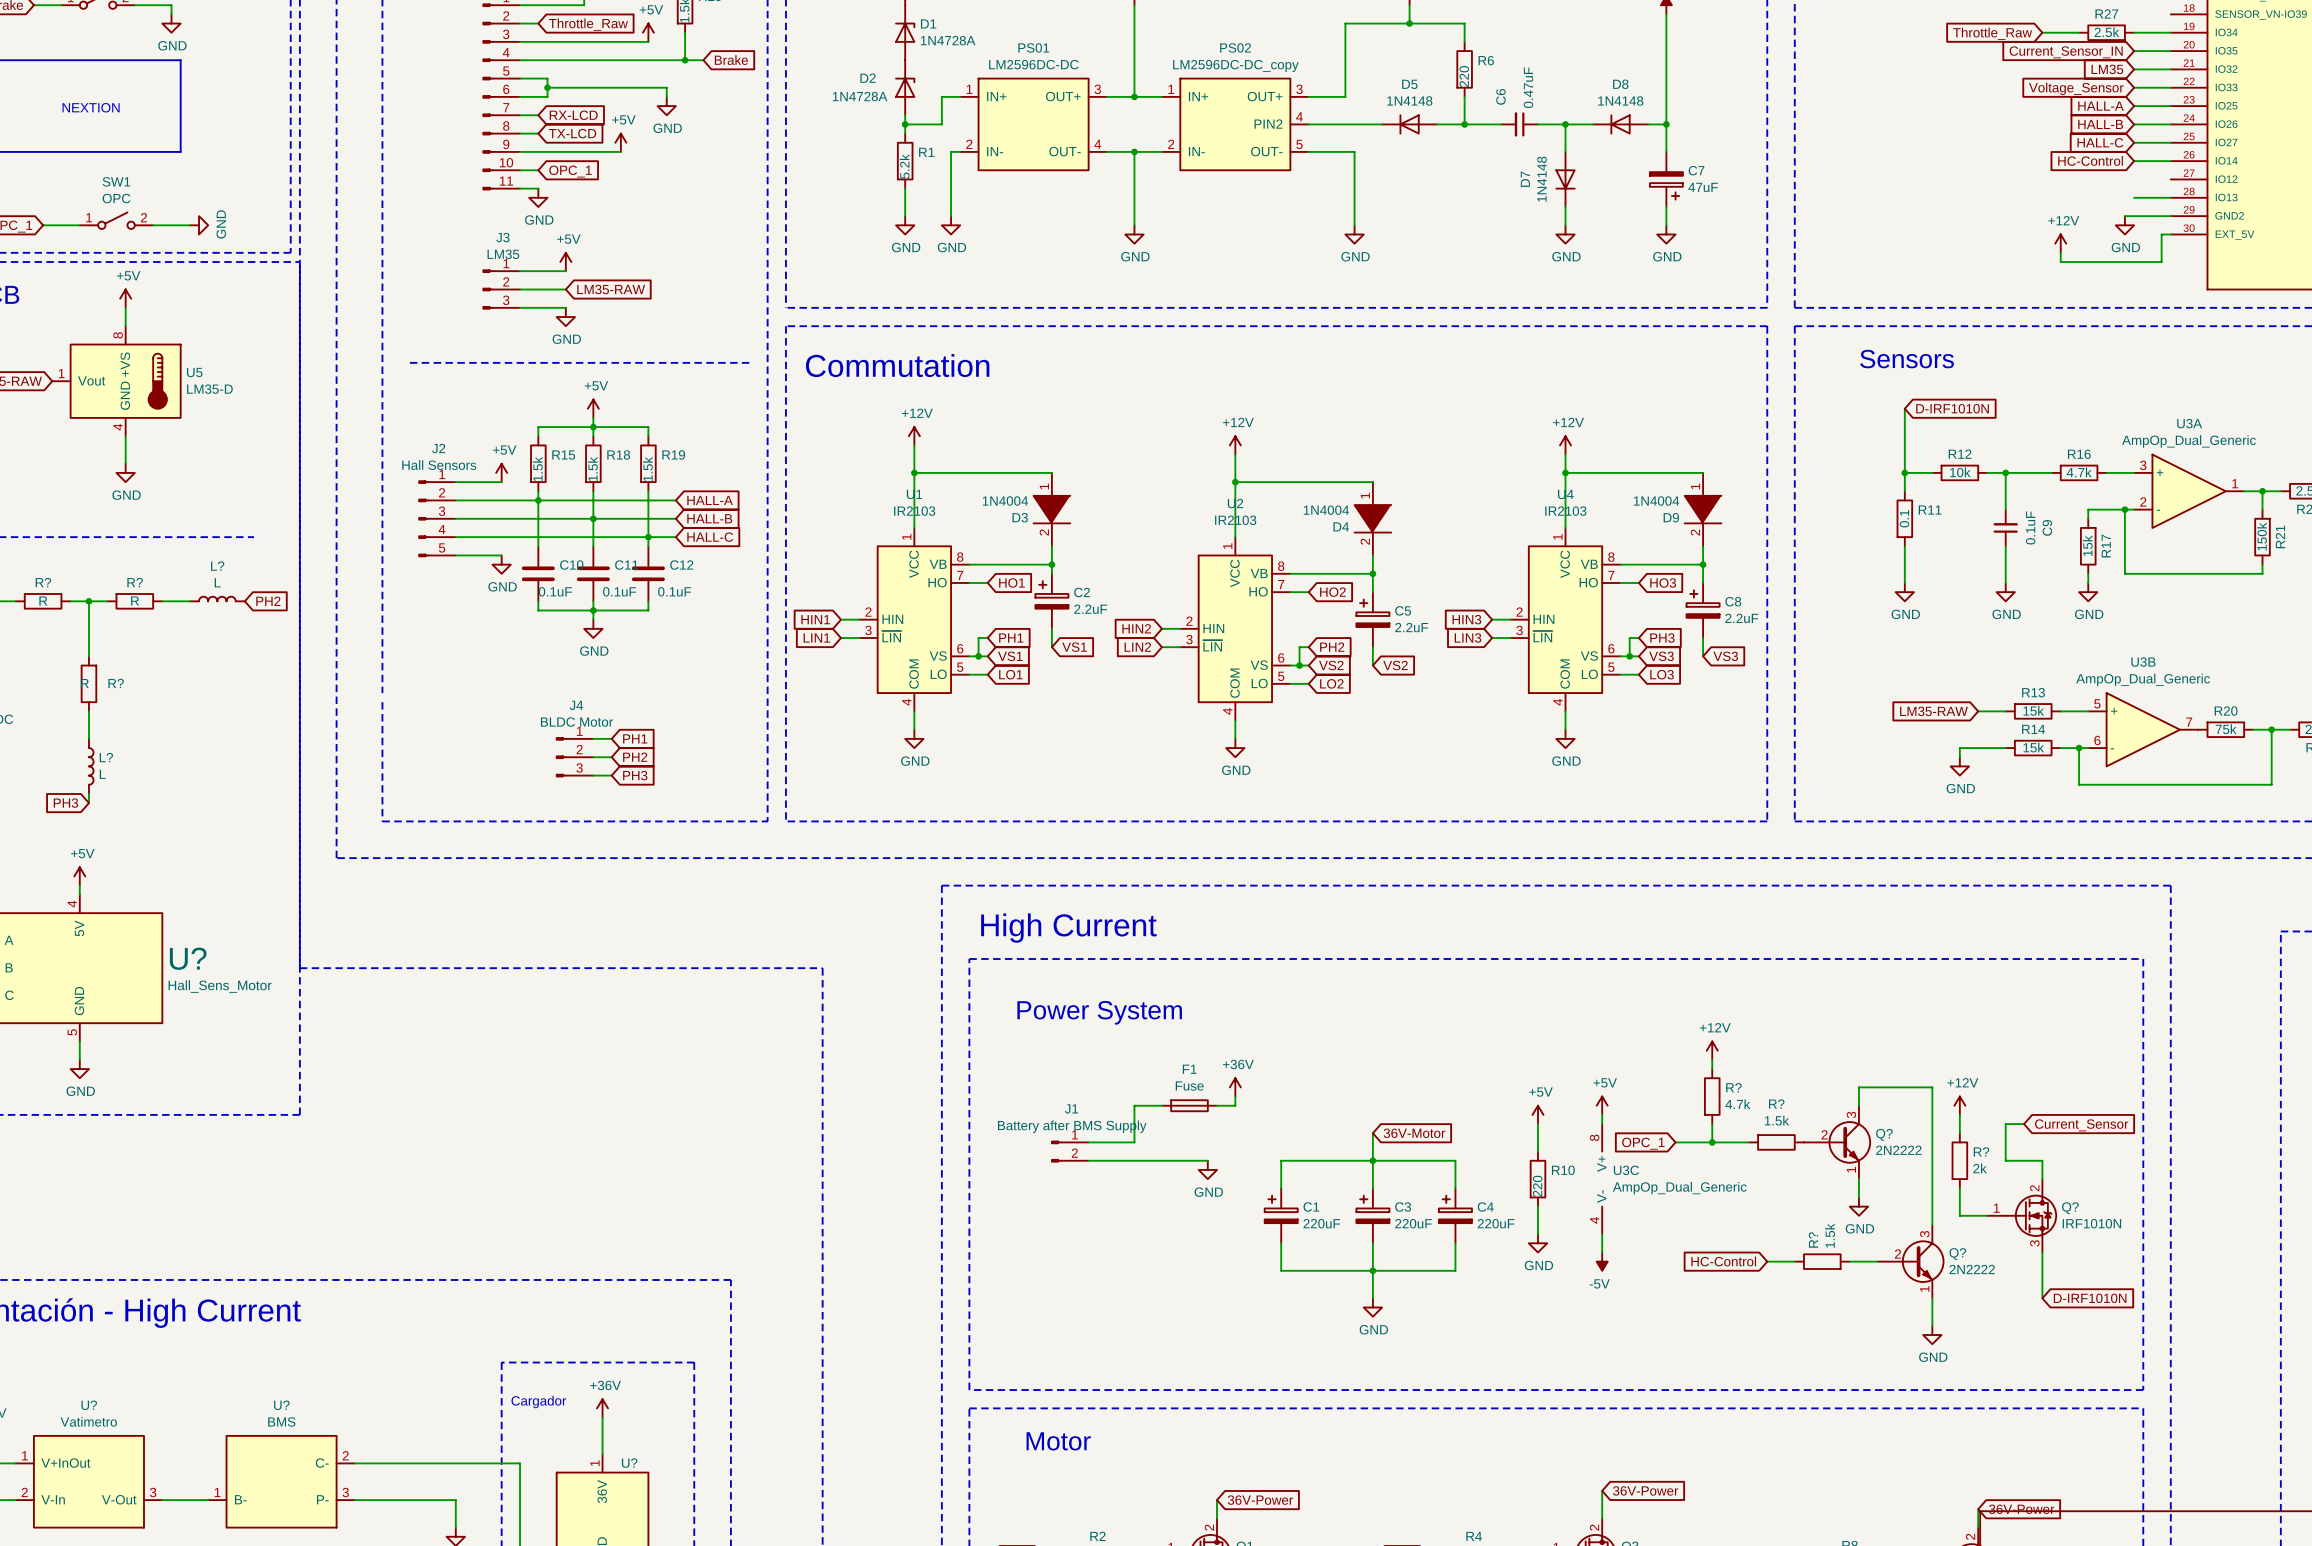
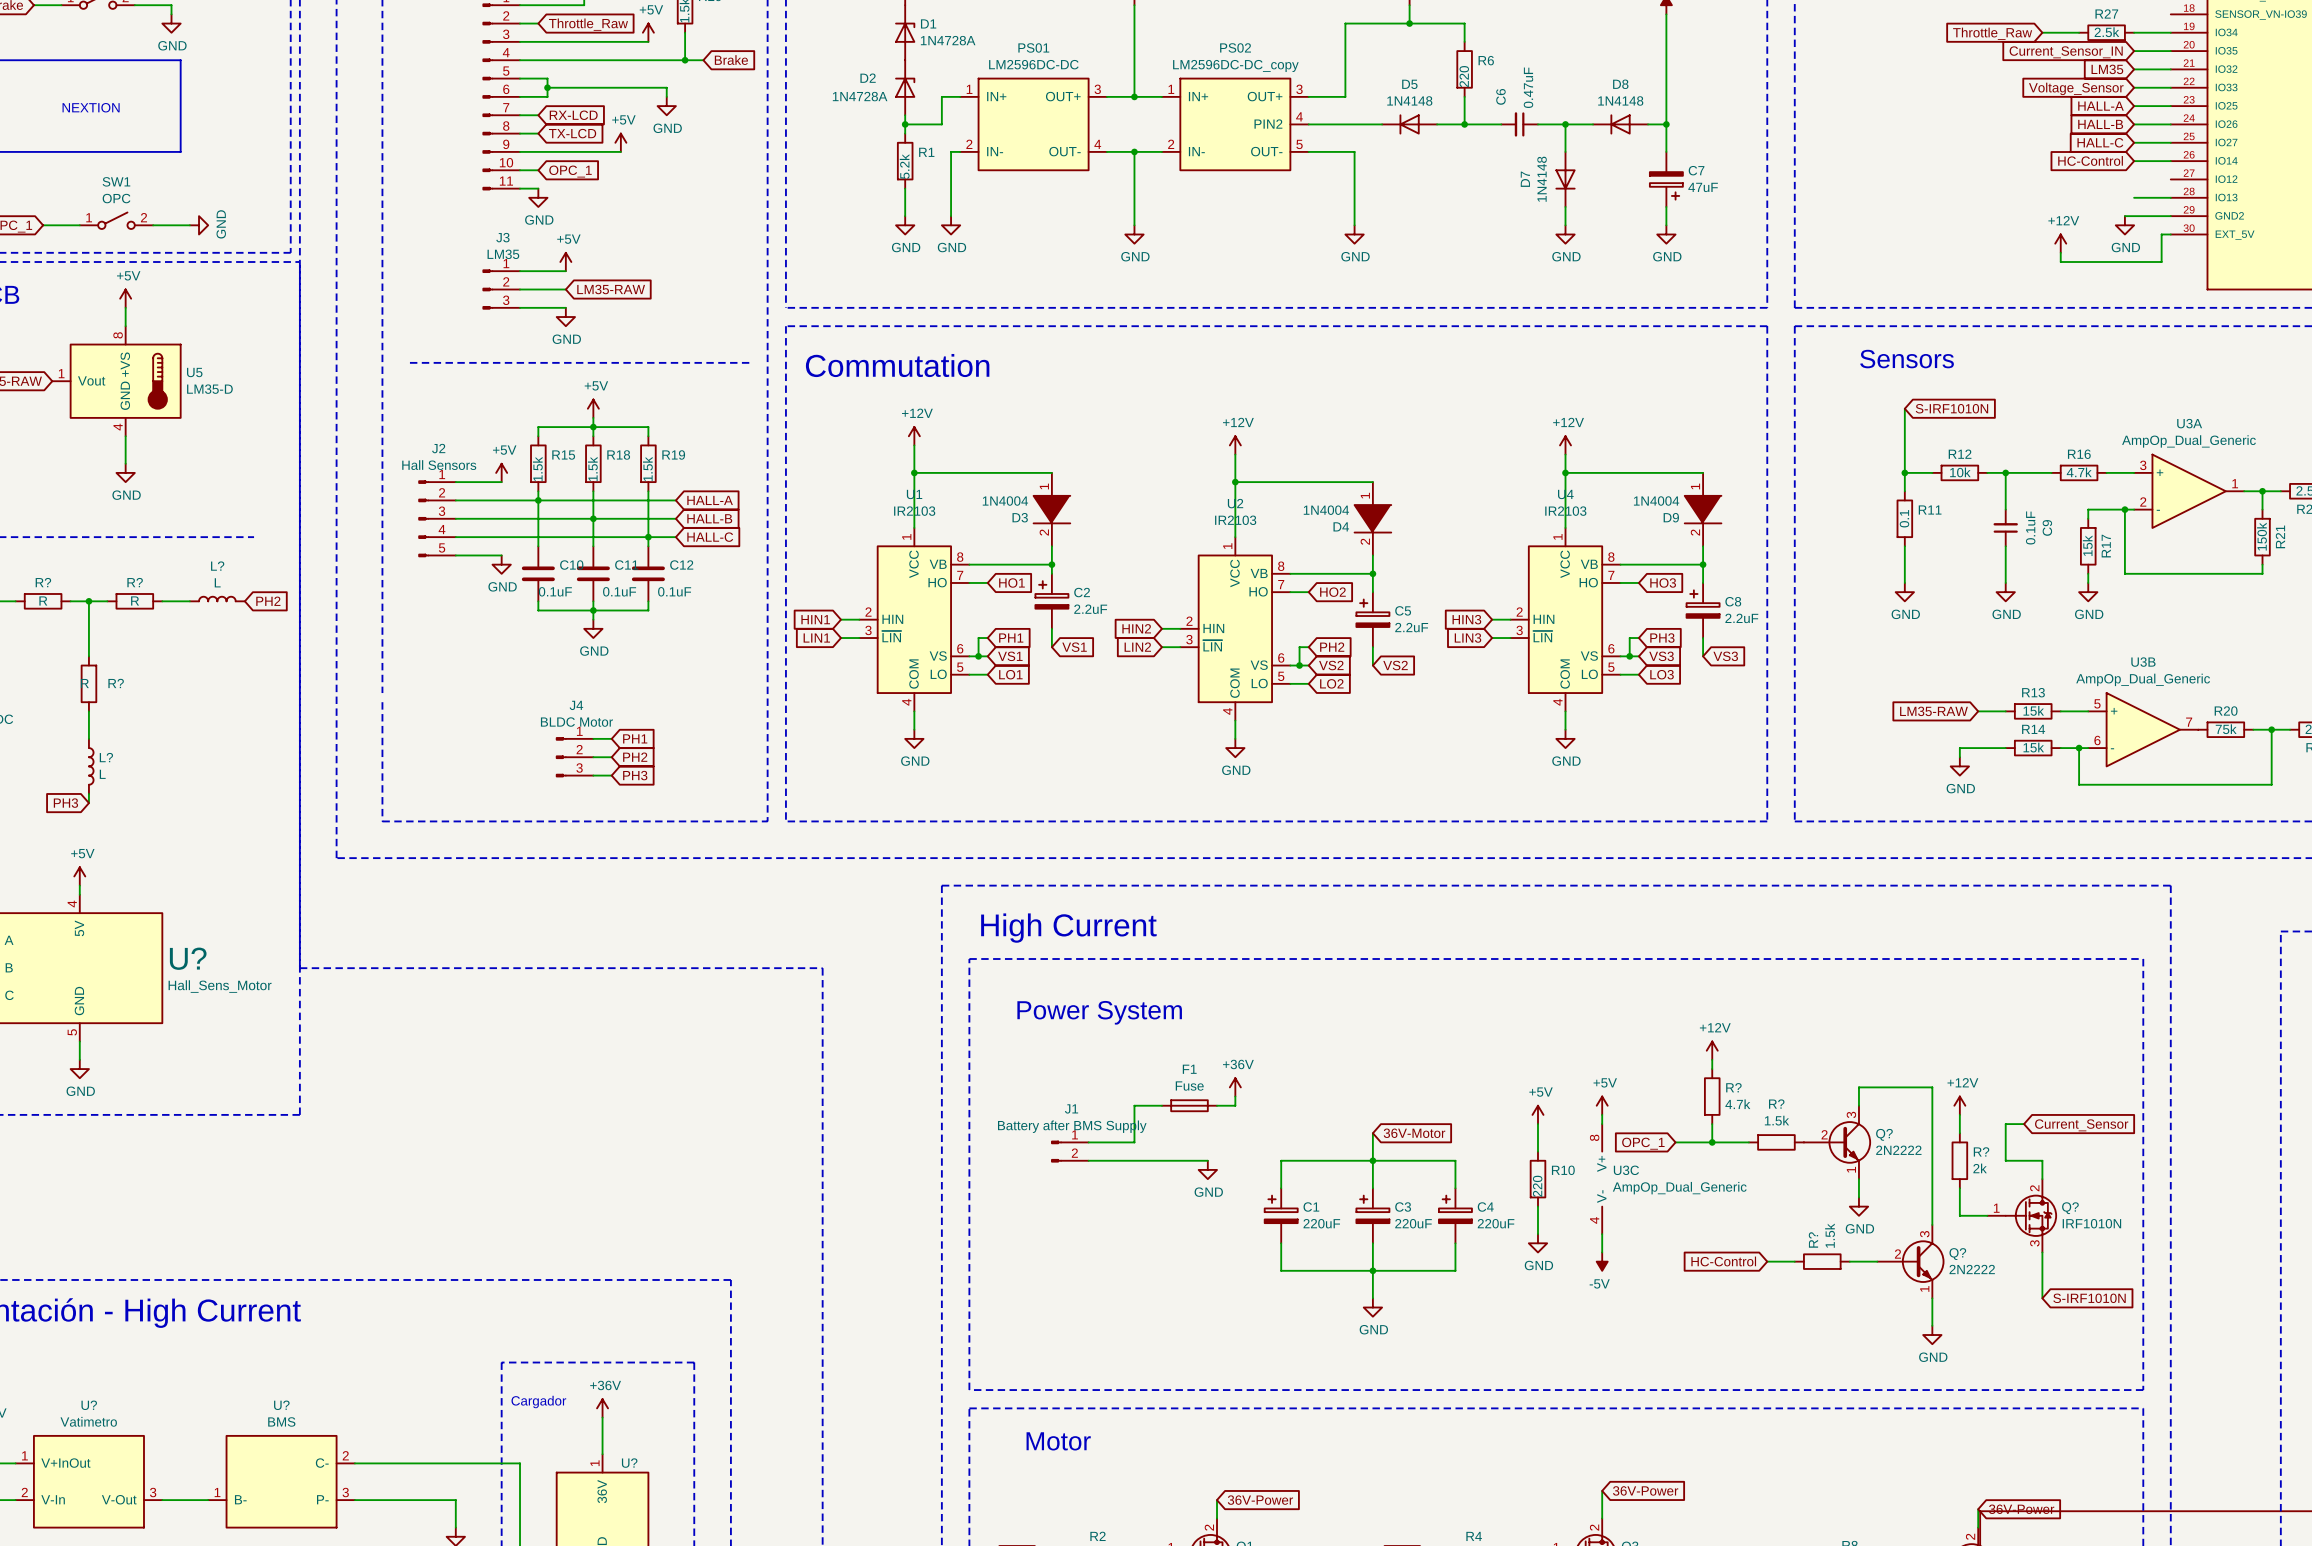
global label: D-IRF1010N (1952, 408) -> S-IRF1010N (1951, 408)
global label: D-IRF1010N (2090, 1298) -> S-IRF1010N (2089, 1298)

